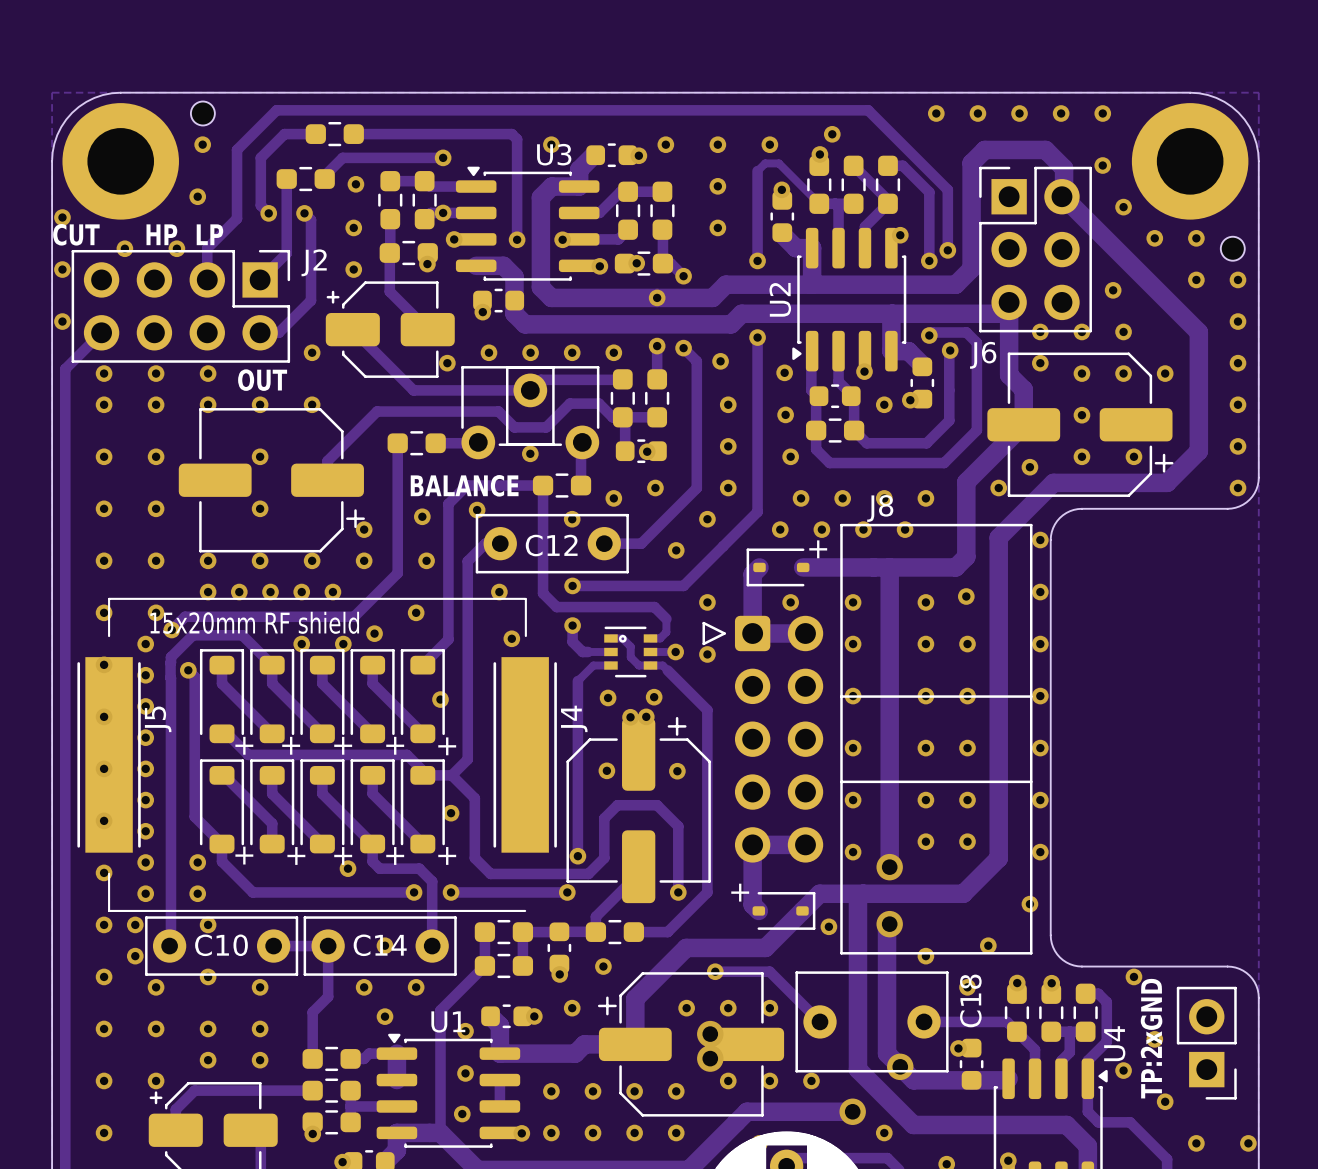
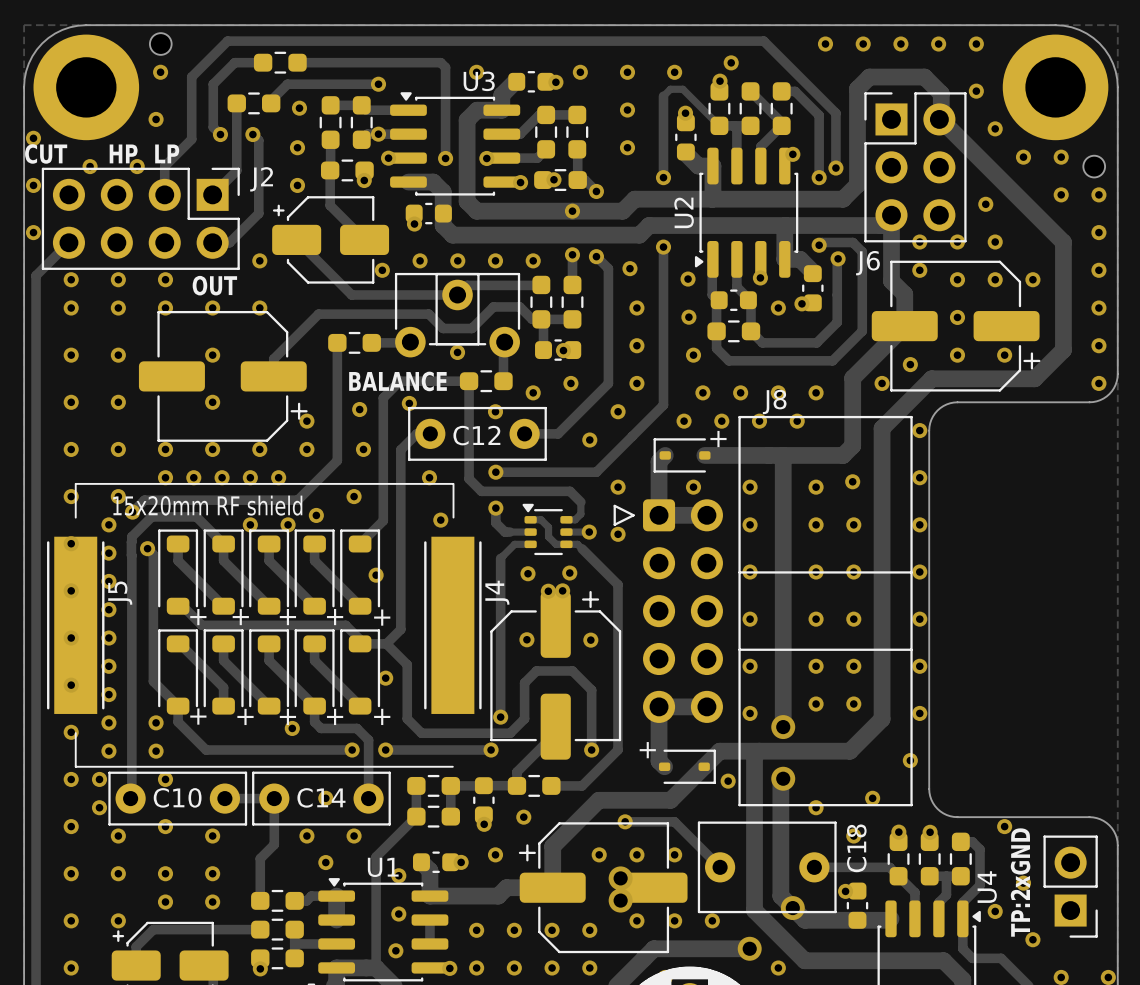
part footprint: [604, 626, 658, 678] -> [522, 503, 573, 556]

